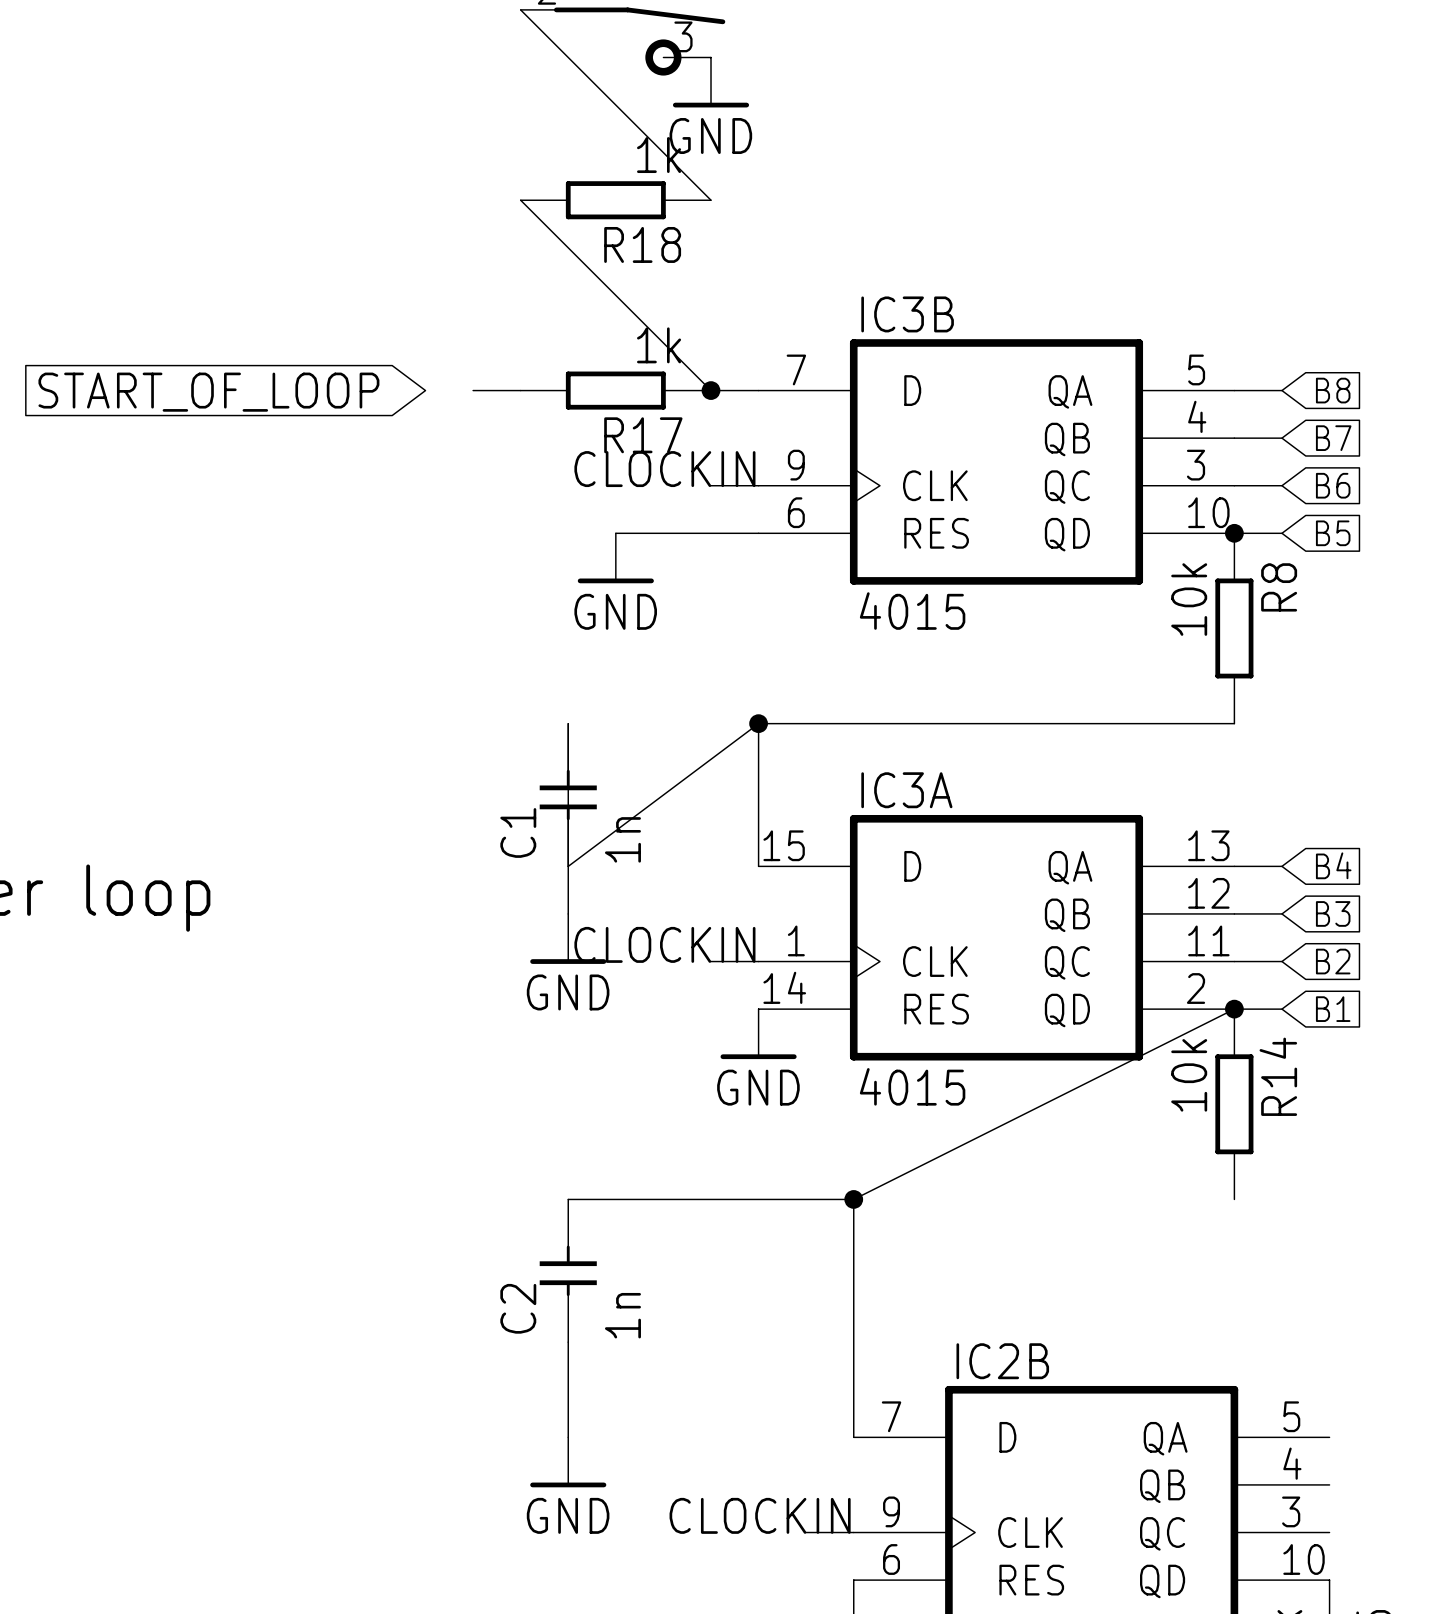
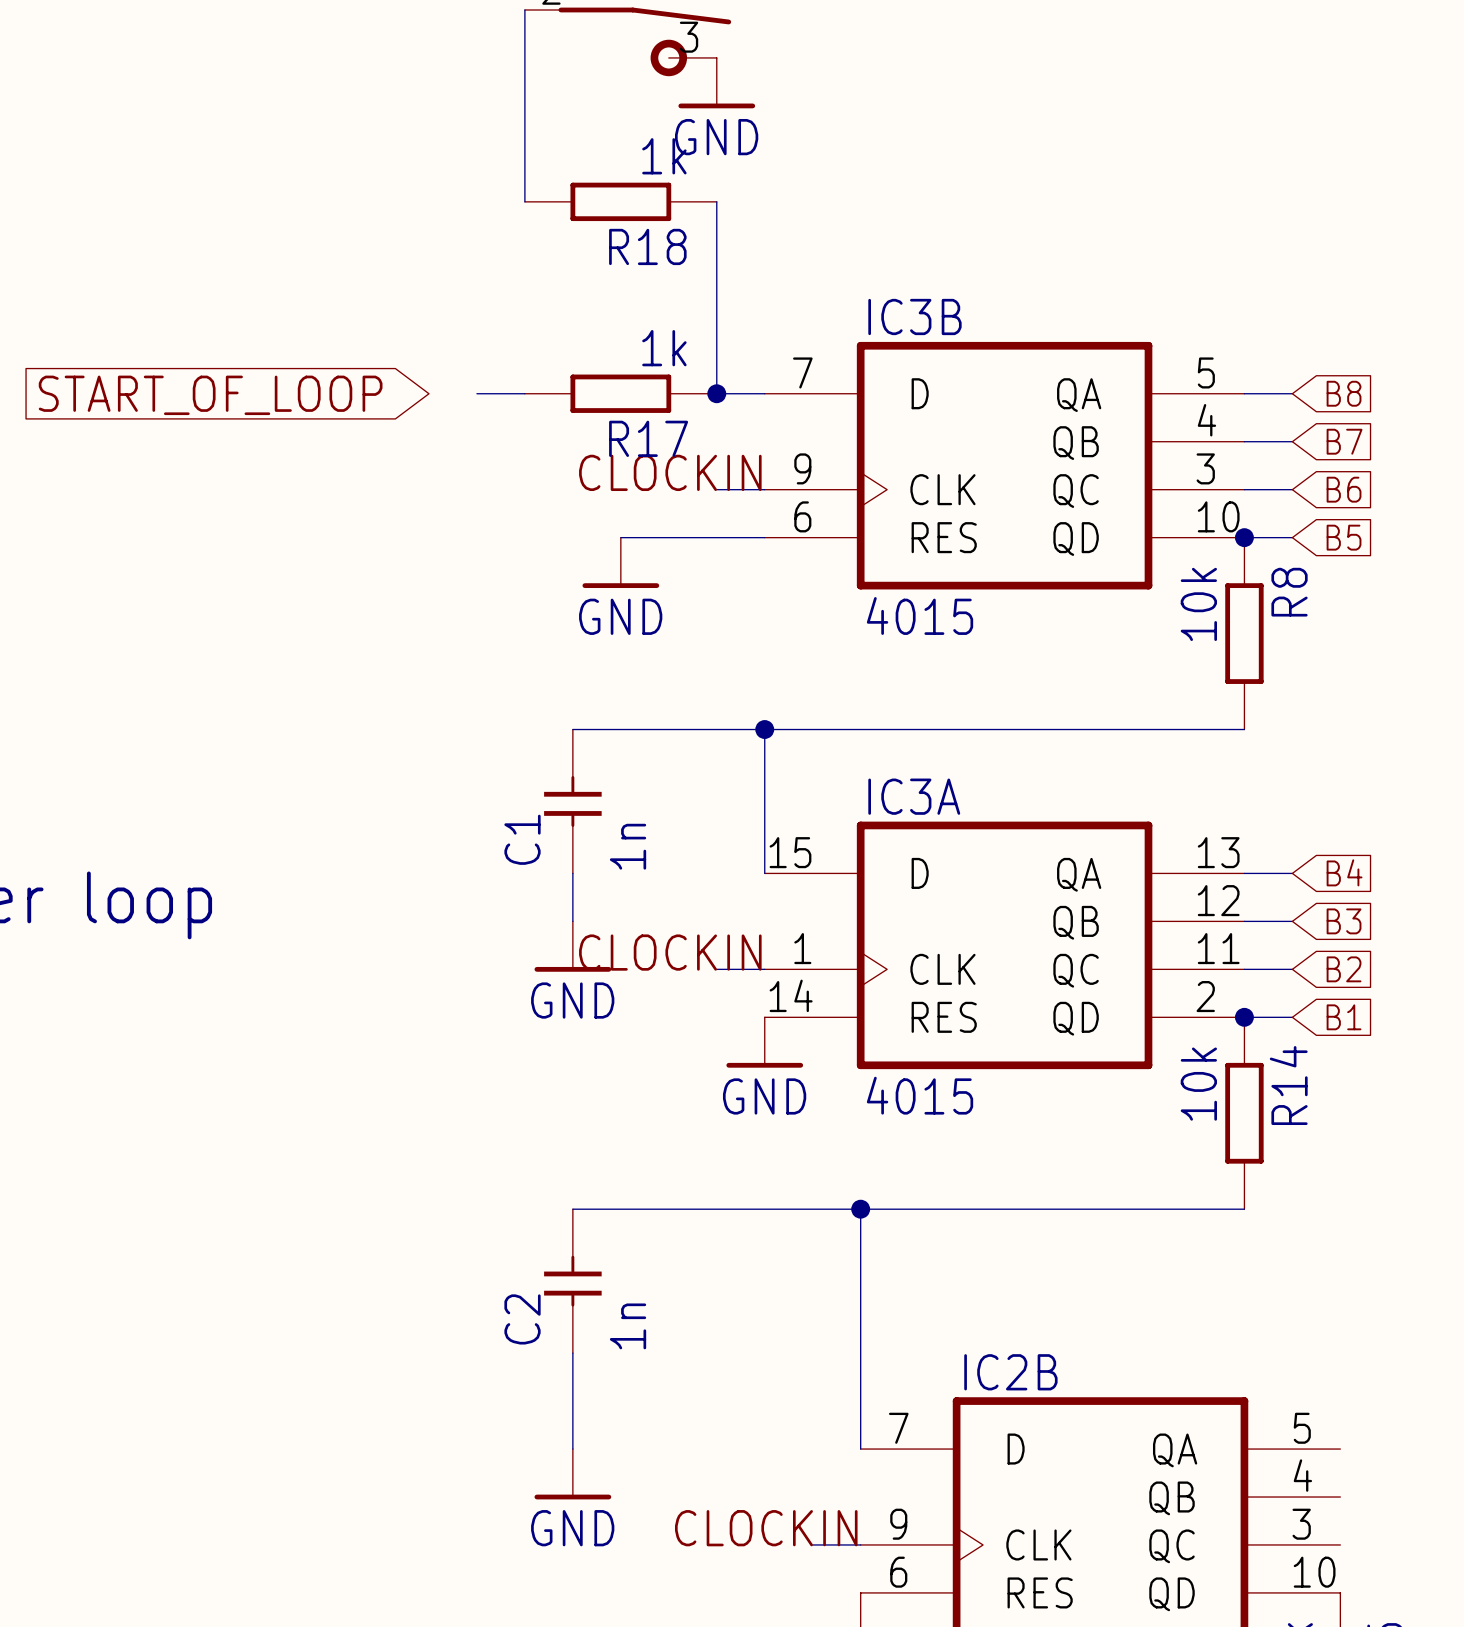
wire: (520, 9) (711, 200) -> (524, 9) (524, 201)
wire: (520, 200) (711, 390) -> (716, 201) (716, 393)
wire: (568, 723) (568, 866) (758, 723) -> (572, 729) (764, 729)
wire: (1234, 1009) (853, 1199) -> (1244, 1209) (860, 1209)

